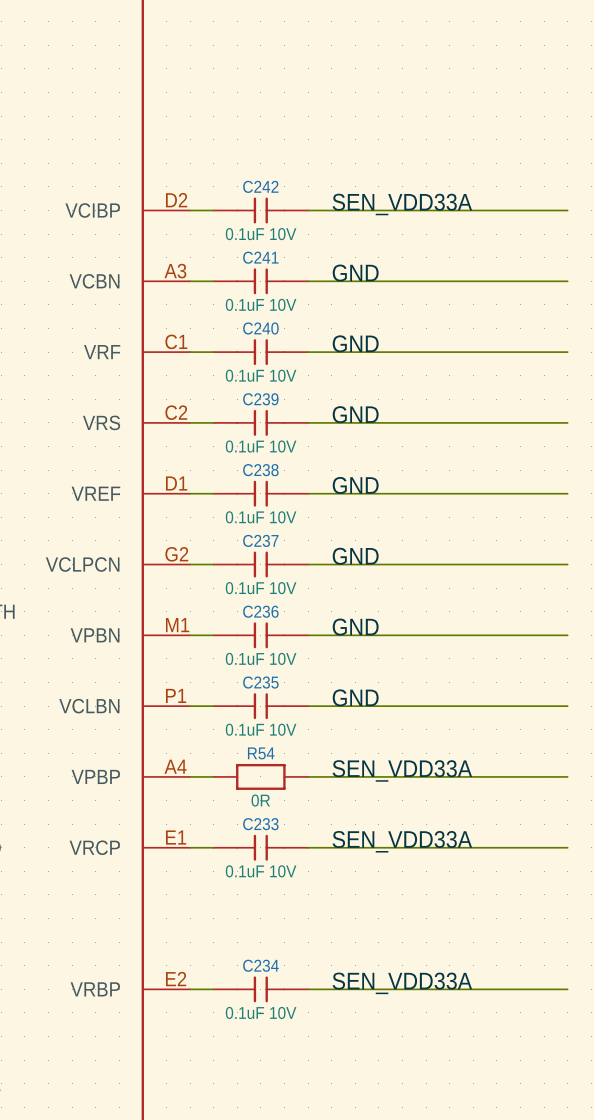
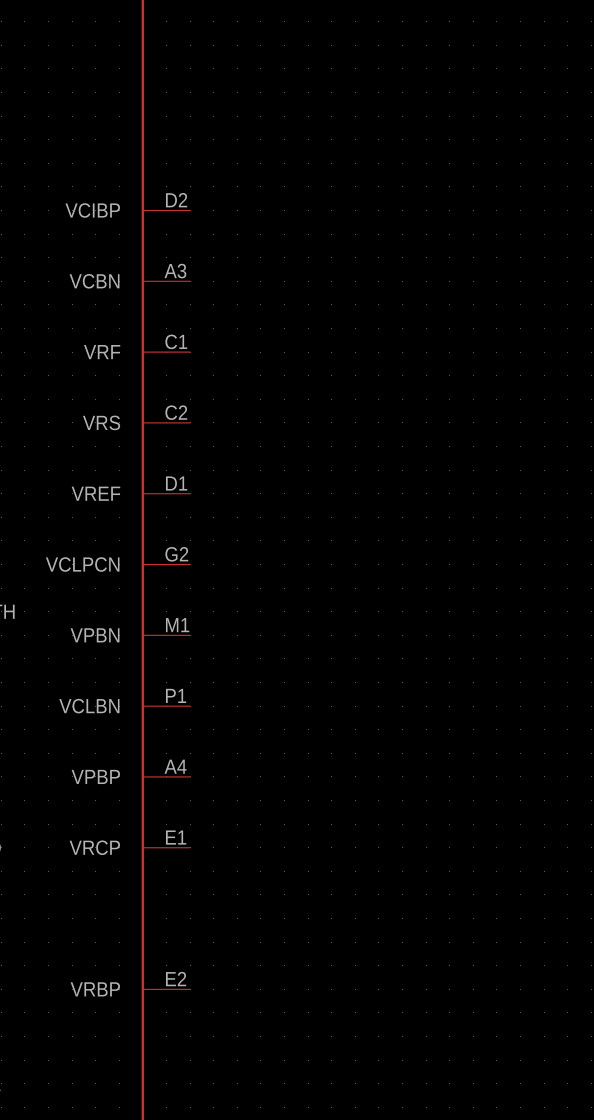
label: SEN_VDD33A (402, 204) -> none
wire: (190, 210) (213, 210) -> none
C242: 0.1uF 10V (260, 210) -> none
wire: (308, 210) (567, 210) -> none
label: GND (355, 273) -> none
wire: (190, 281) (213, 281) -> none
C241: 0.1uF 10V (260, 281) -> none
wire: (308, 281) (567, 281) -> none
label: GND (355, 343) -> none
wire: (190, 352) (213, 352) -> none
C240: 0.1uF 10V (260, 352) -> none
wire: (308, 352) (567, 352) -> none
label: GND (355, 414) -> none
wire: (190, 422) (213, 422) -> none
C239: 0.1uF 10V (260, 422) -> none
wire: (308, 422) (567, 422) -> none
label: GND (355, 485) -> none
wire: (190, 493) (213, 493) -> none
C238: 0.1uF 10V (260, 493) -> none
wire: (308, 493) (567, 493) -> none
label: GND (355, 556) -> none
wire: (190, 564) (213, 564) -> none
C237: 0.1uF 10V (260, 564) -> none
wire: (308, 564) (567, 564) -> none
label: GND (355, 627) -> none
wire: (190, 635) (213, 635) -> none
C236: 0.1uF 10V (260, 635) -> none
wire: (308, 635) (567, 635) -> none
label: GND (355, 697) -> none
wire: (190, 706) (213, 706) -> none
C235: 0.1uF 10V (260, 706) -> none
wire: (308, 706) (567, 706) -> none
label: SEN_VDD33A (402, 770) -> none
wire: (190, 776) (213, 776) -> none
R54: 0R (260, 776) -> none
wire: (308, 776) (567, 776) -> none
label: SEN_VDD33A (402, 841) -> none
wire: (190, 847) (213, 847) -> none
C233: 0.1uF 10V (260, 847) -> none
wire: (308, 847) (567, 847) -> none
label: SEN_VDD33A (402, 983) -> none
wire: (190, 989) (213, 989) -> none
C234: 0.1uF 10V (260, 989) -> none
wire: (308, 989) (567, 989) -> none

